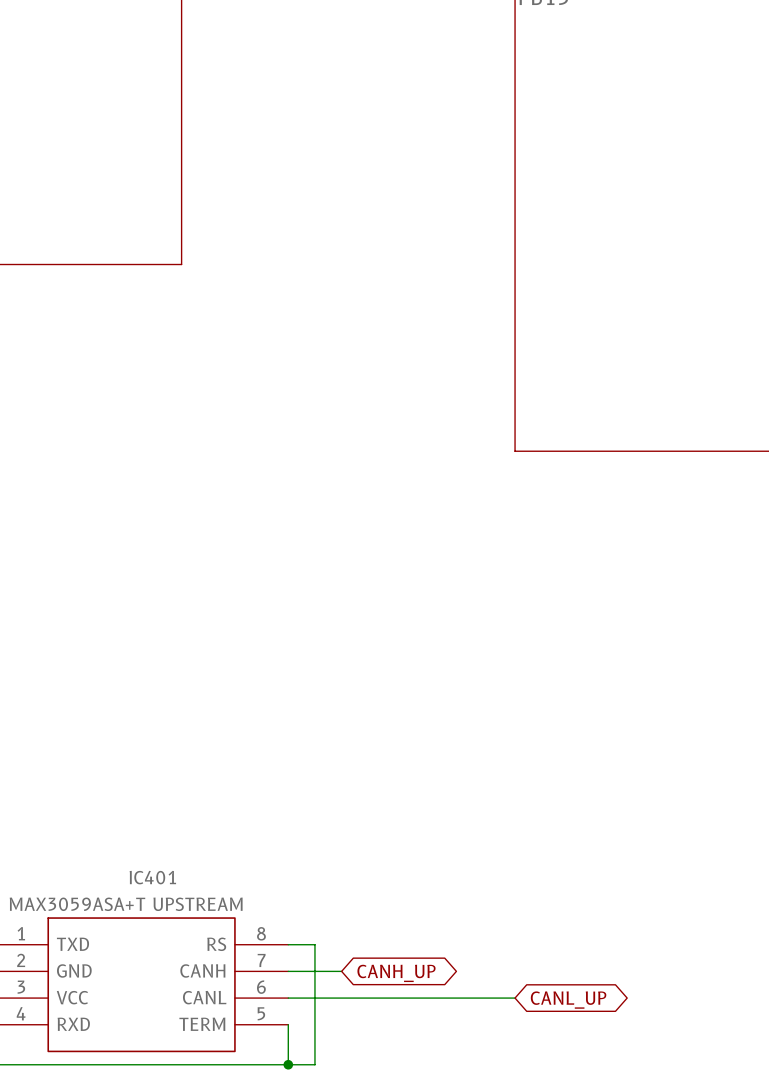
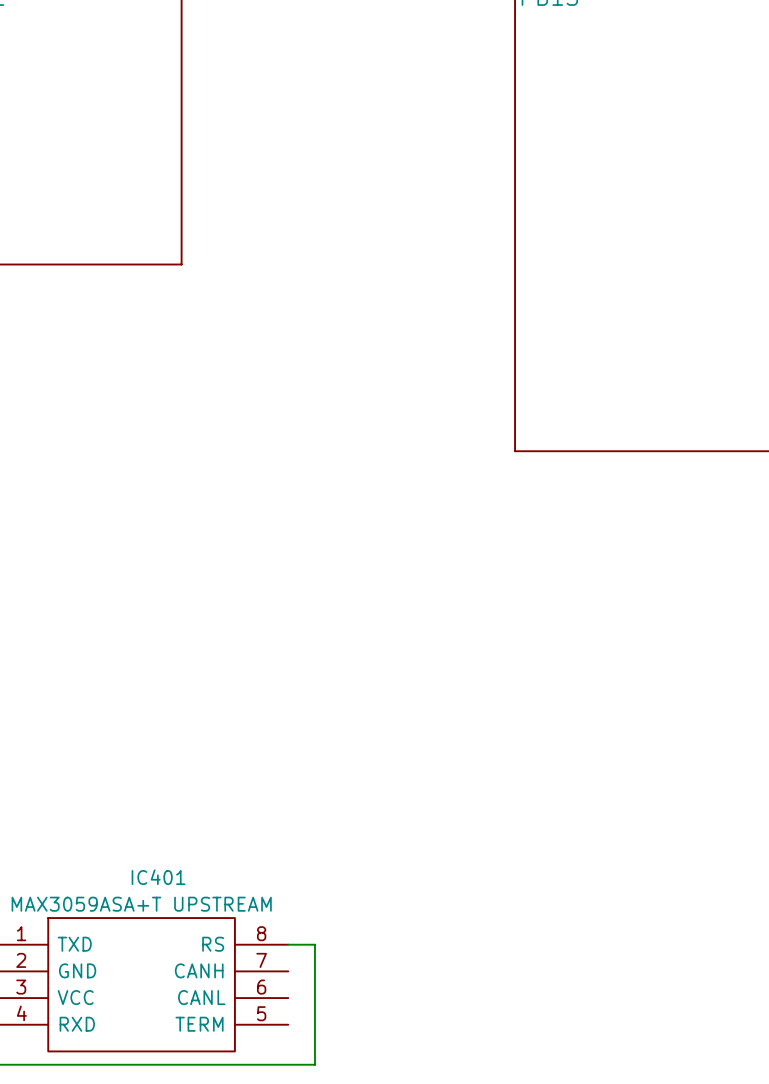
wire: (288, 971) (341, 971) -> none
global label: CANH_UP (396, 973) -> none
wire: (288, 998) (515, 998) -> none
global label: CANL_UP (568, 1000) -> none
wire: (288, 1024) (288, 1064) -> none
junction: (288, 1064) -> none

